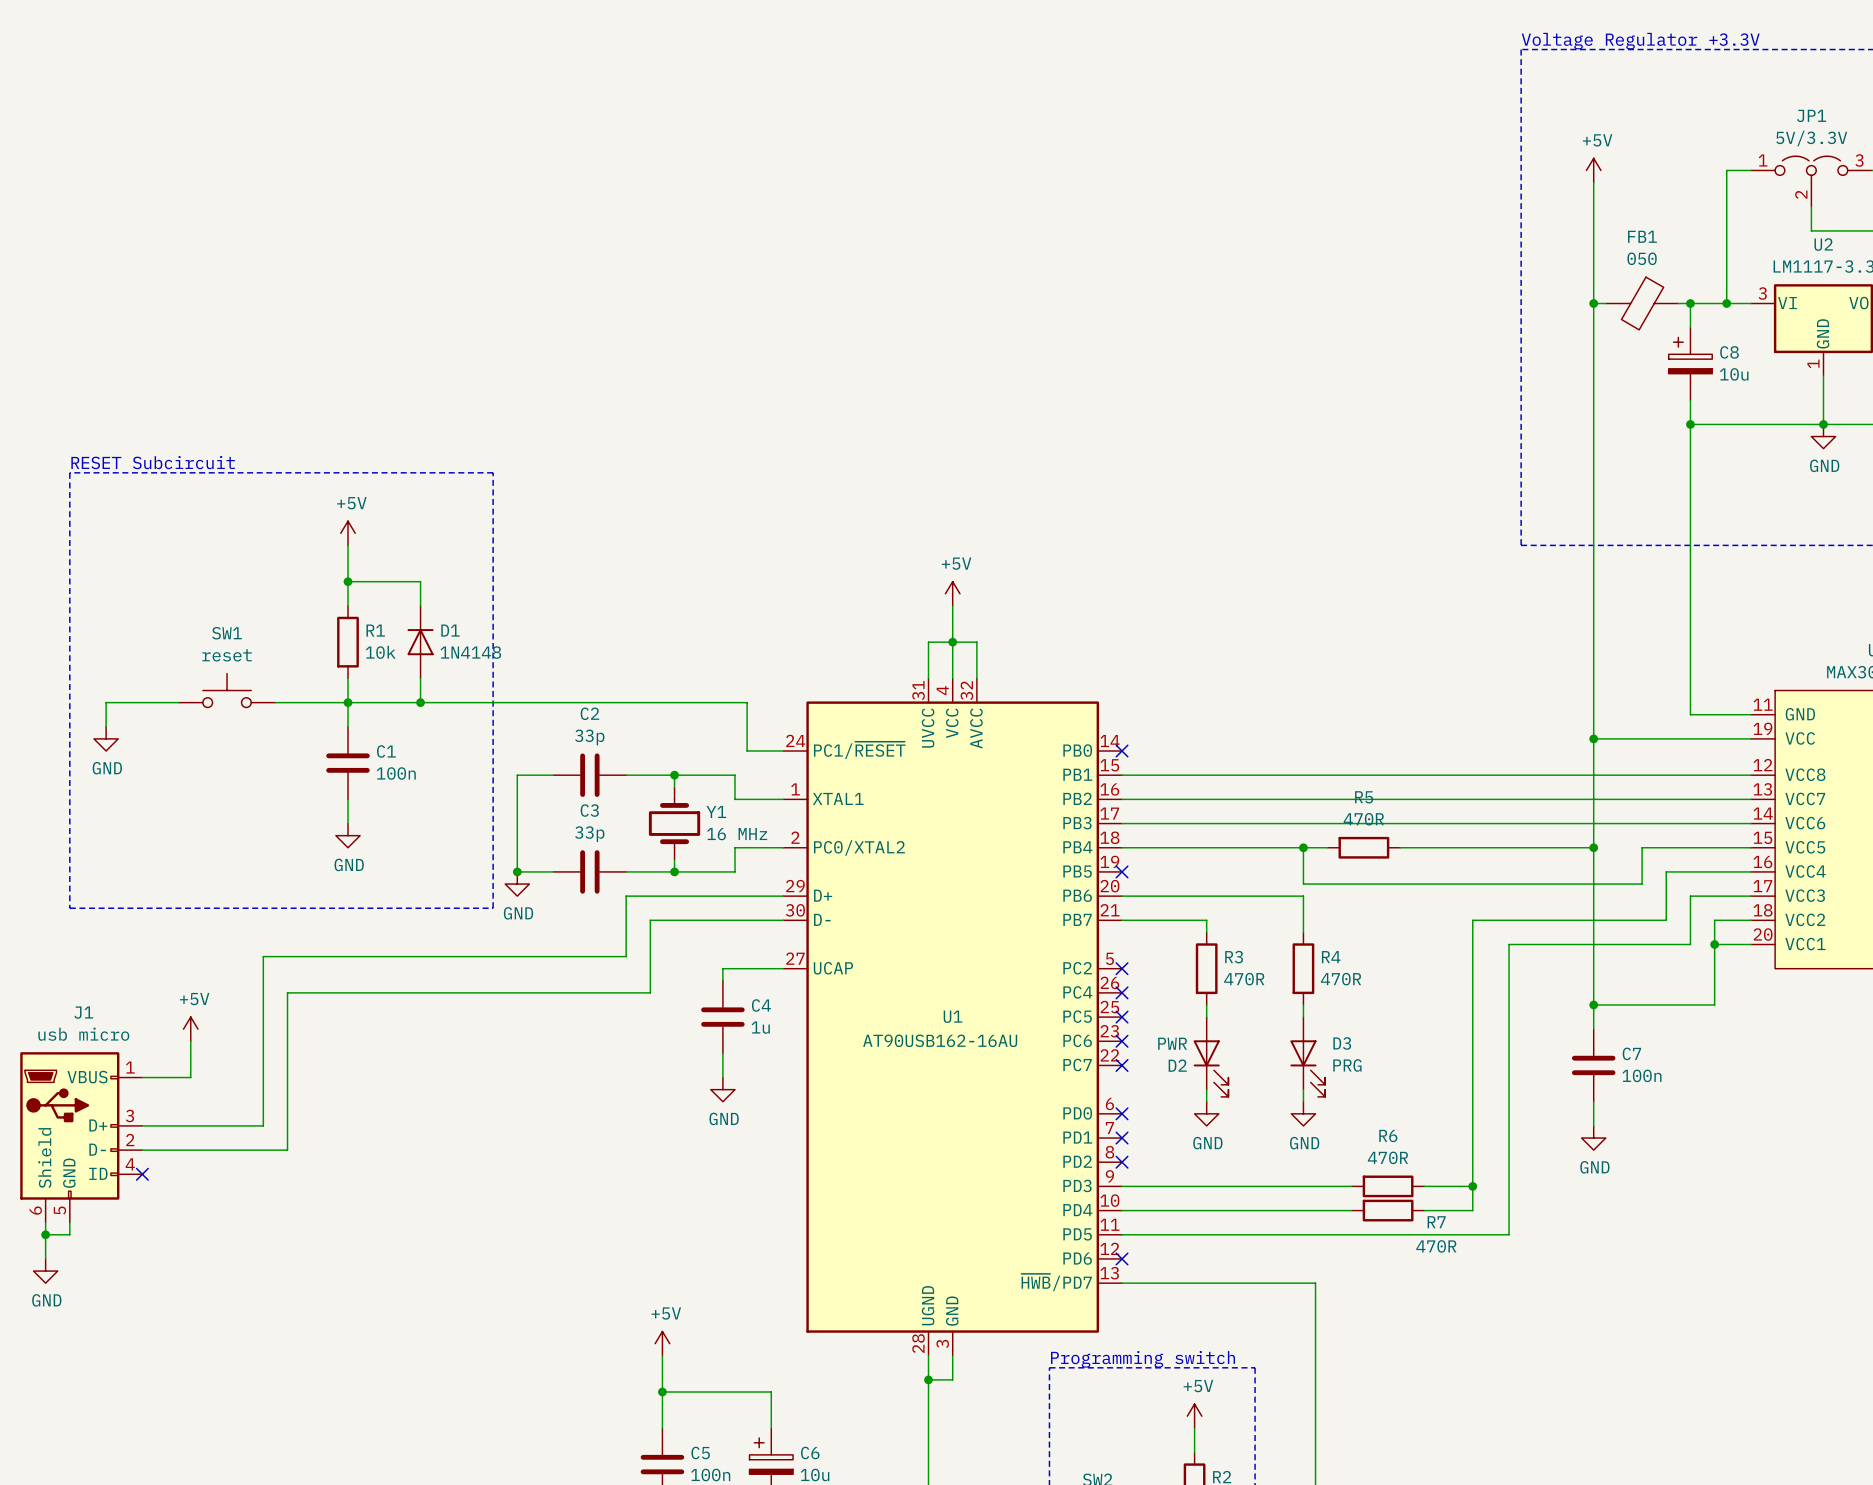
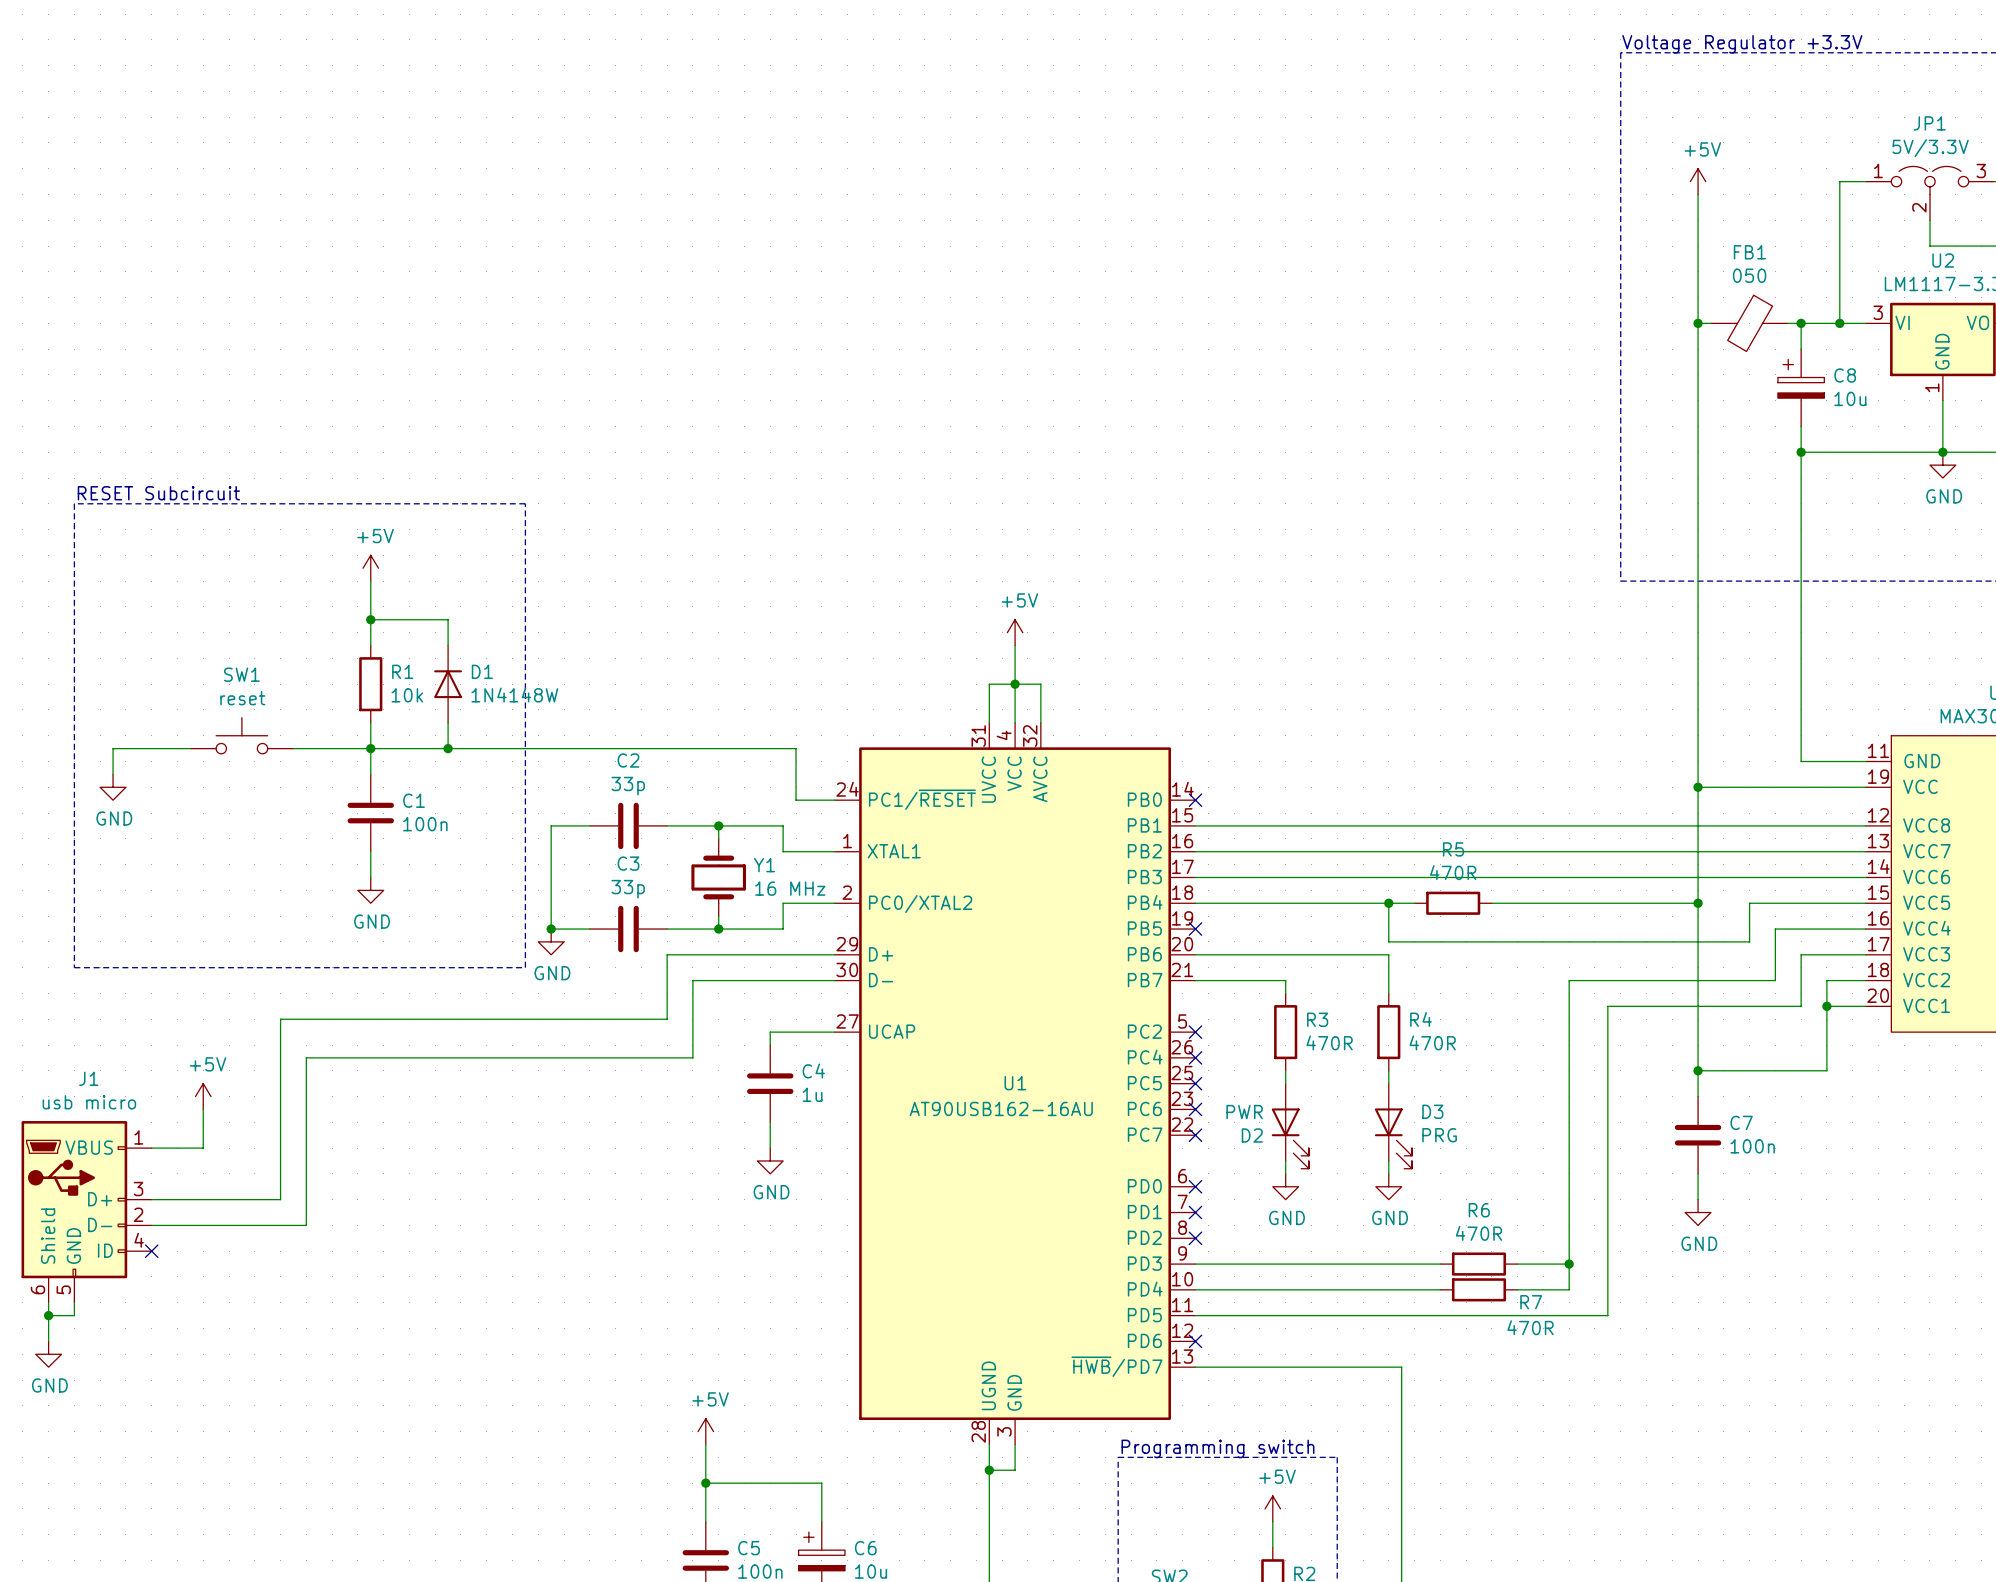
D1 value: 1N4148 (470, 652) -> 1N4148W (514, 695)

